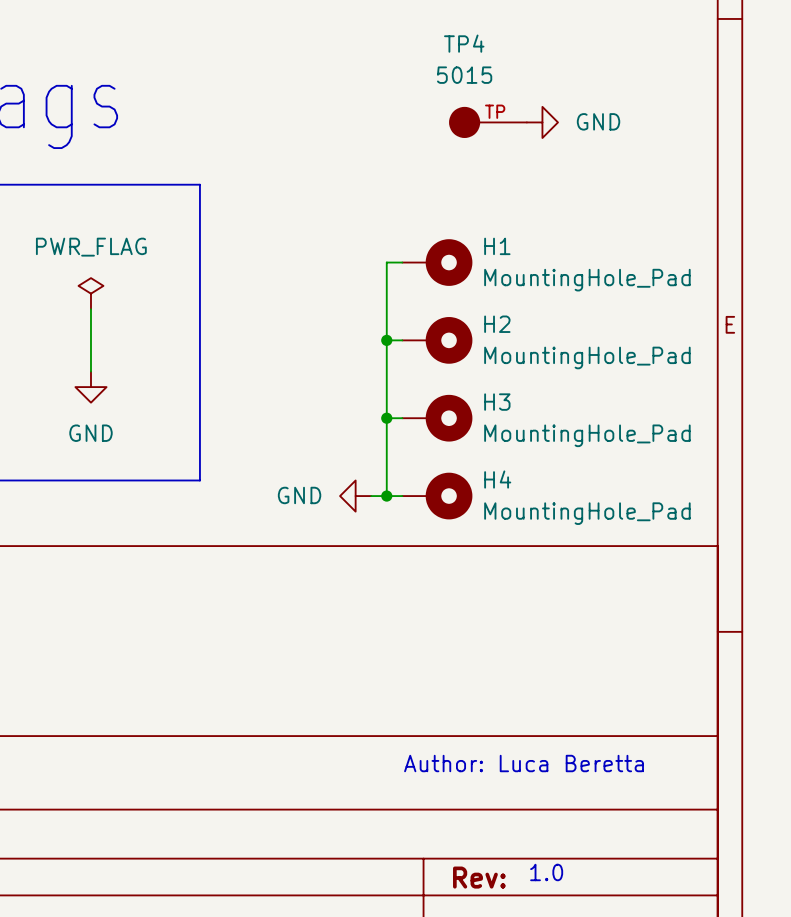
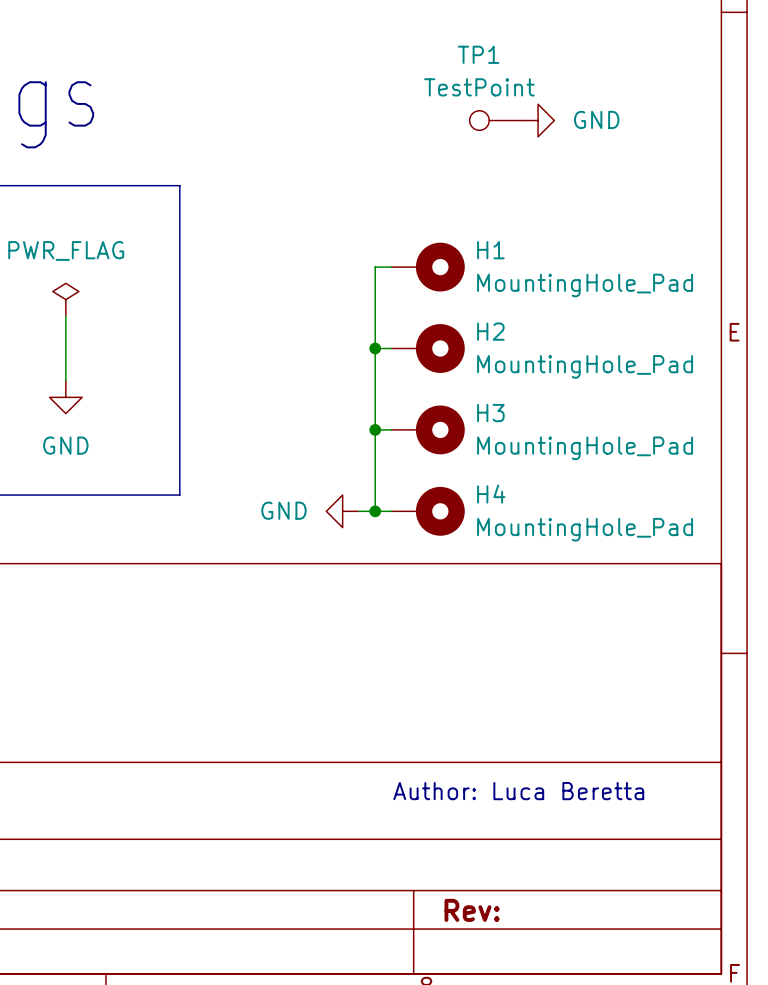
TP4: 5015 (487, 122) -> none
TP1: none -> TestPoint (495, 120)
text: 1.0 (546, 872) -> none

